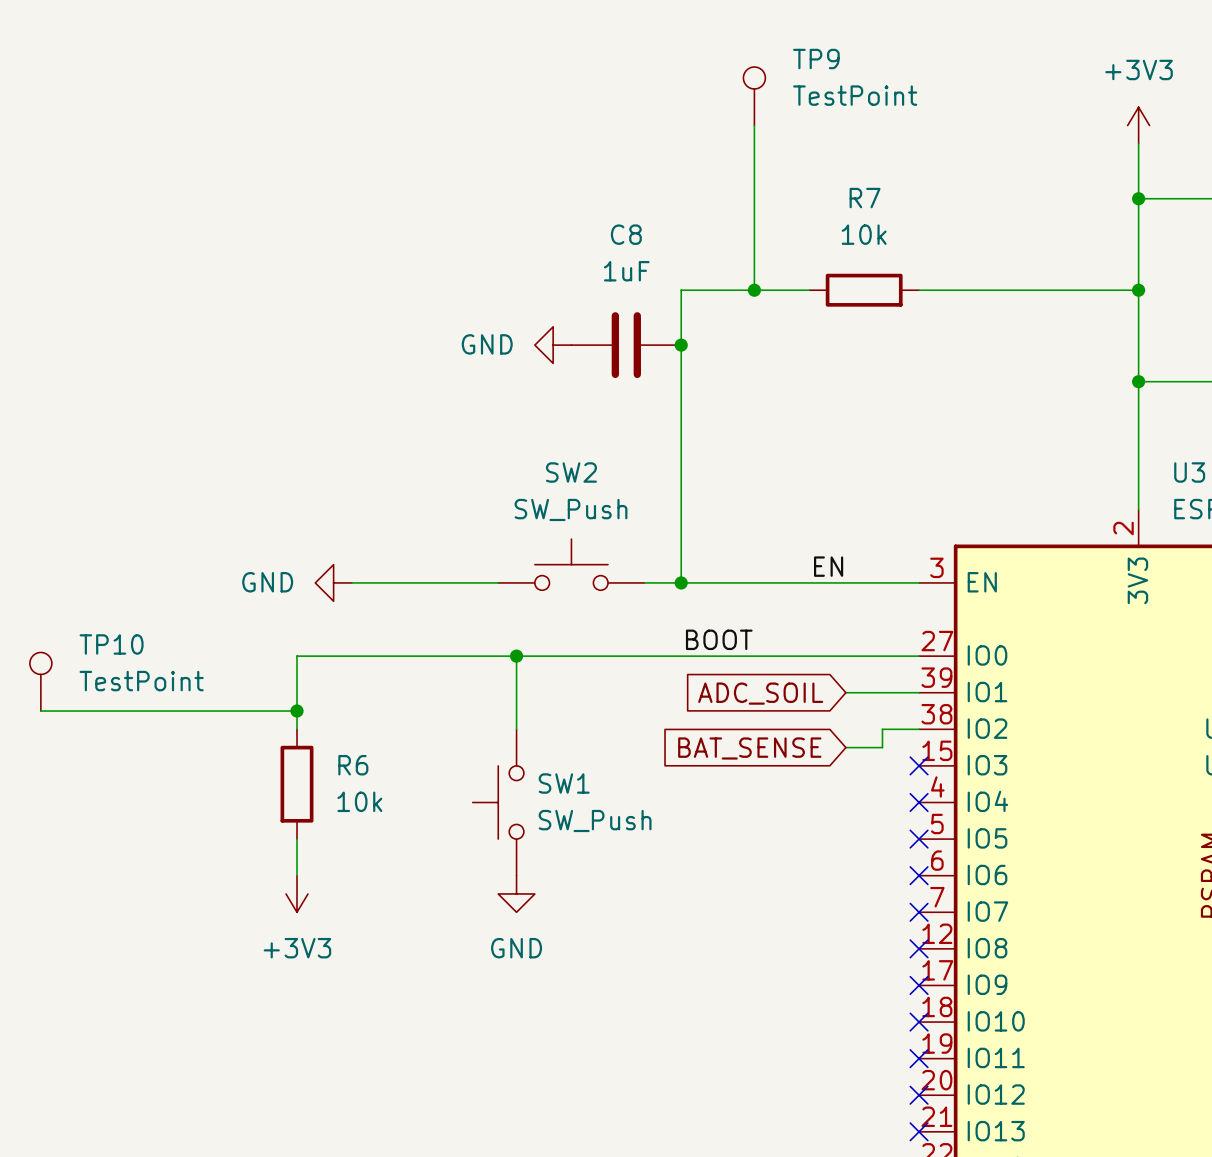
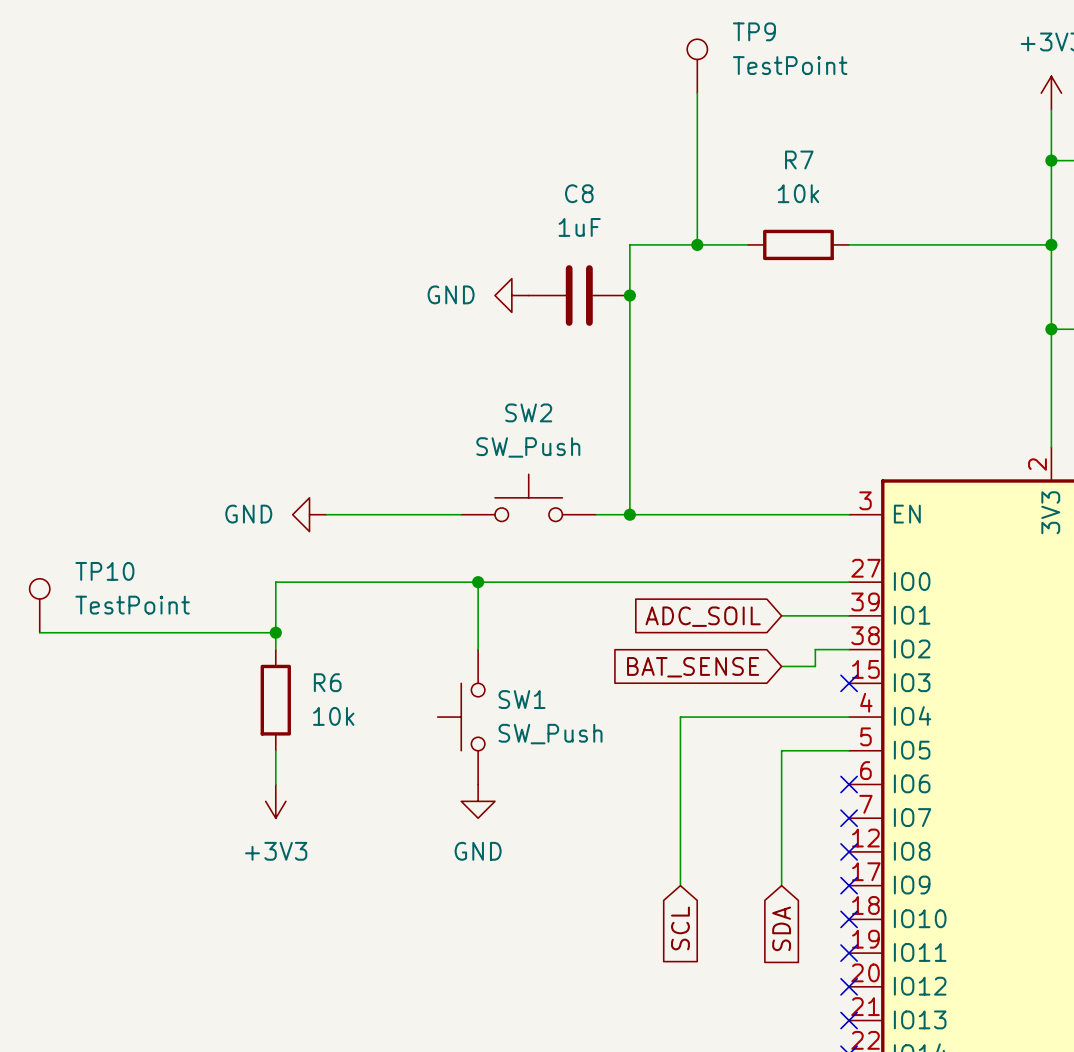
label: EN (828, 566) -> none
label: BOOT (719, 639) -> none
wire: none -> (849, 717) (680, 717) (680, 885)
no-connect mark: (919, 802) -> none
wire: none -> (849, 750) (781, 750) (781, 885)
no-connect mark: (919, 839) -> none
global label: none -> SCL (680, 928)
global label: none -> SDA (781, 928)

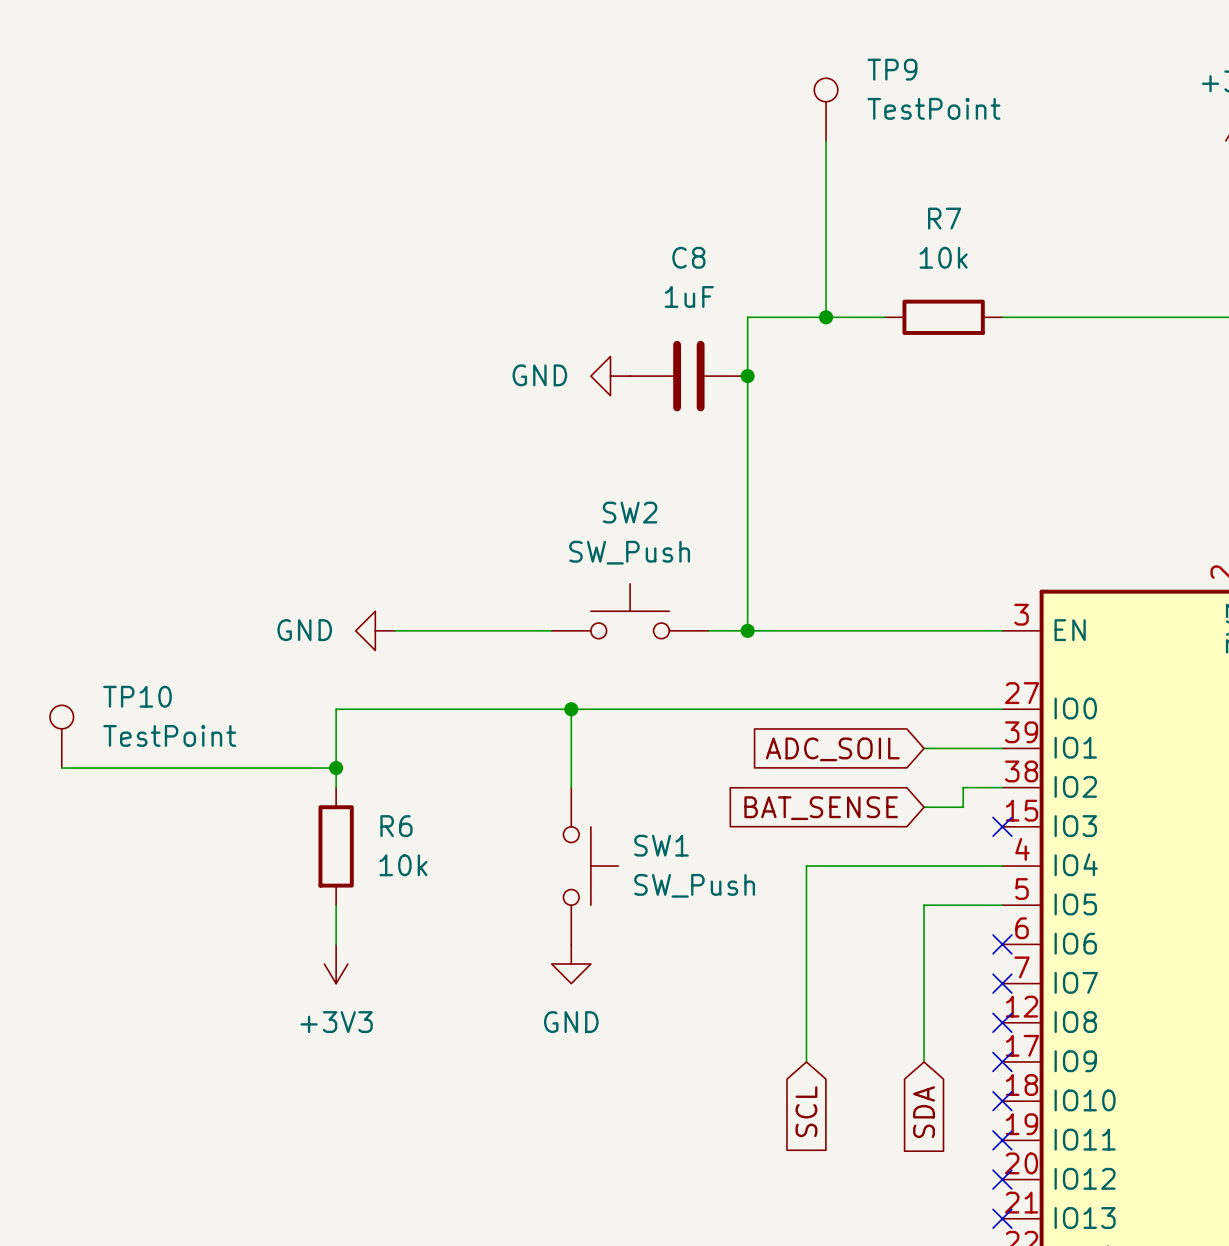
SW1 rotation: 0° (461, 717) -> 180° (590, 866)

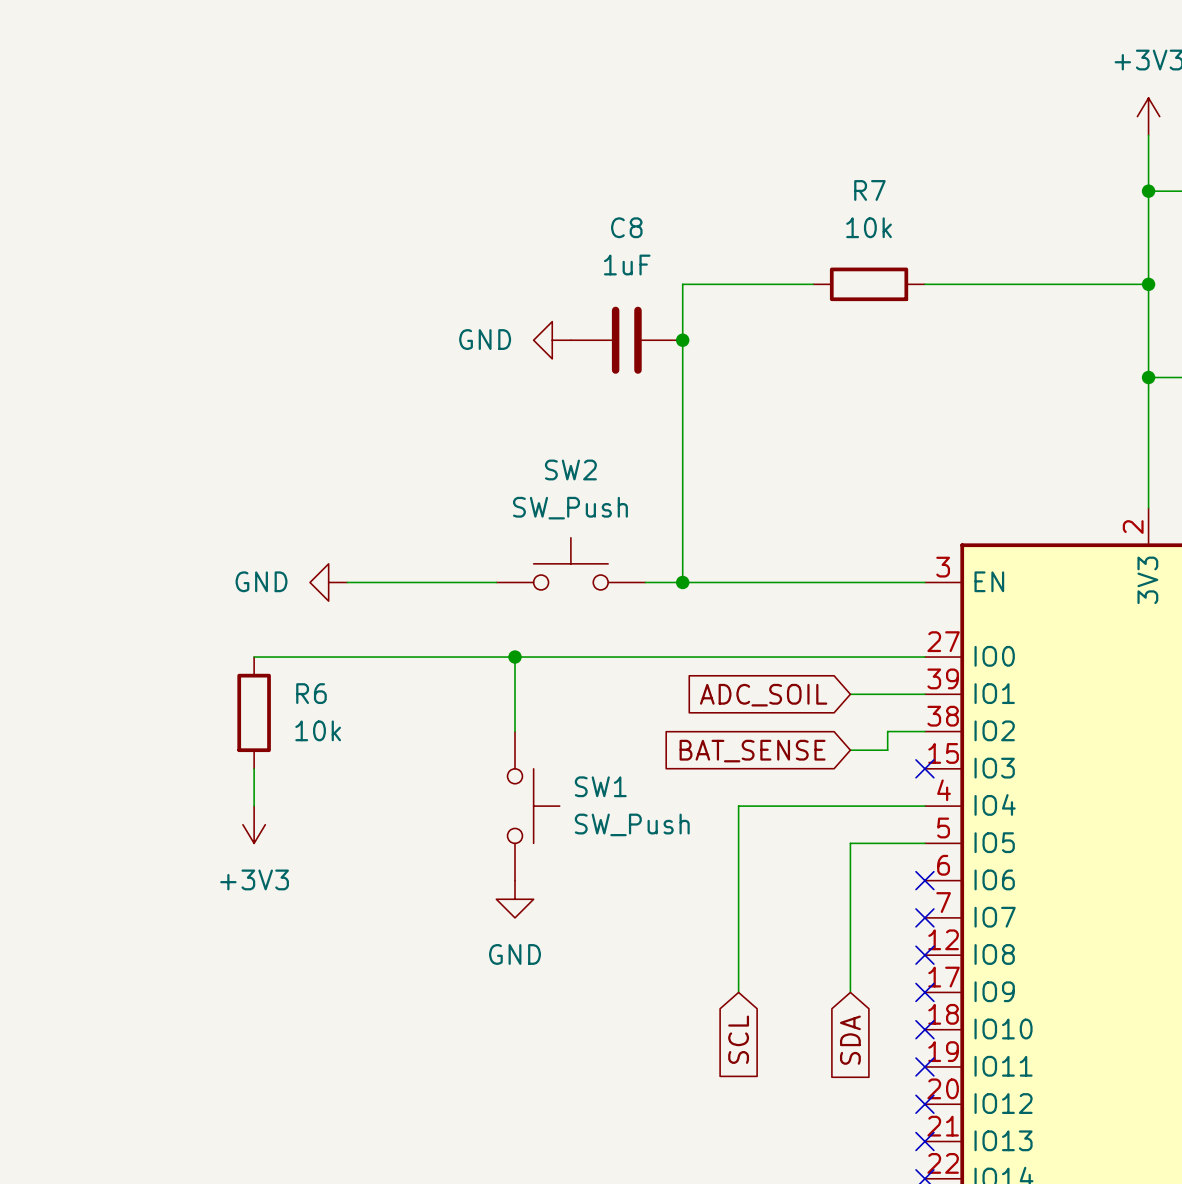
TP9: TestPoint (826, 109) -> none
wire: (826, 140) (826, 317) -> none
junction: (826, 317) -> none
wire: (336, 709) (336, 787) -> (291, 657) (254, 657)
TP10: TestPoint (61, 736) -> none
wire: (61, 768) (336, 768) -> none
junction: (336, 768) -> none
R6 position: (336, 846) -> (254, 712)
wire: (336, 905) (336, 944) -> (254, 768) (254, 806)
power symbol position: +3V3 (336, 964) -> +3V3 (254, 824)

